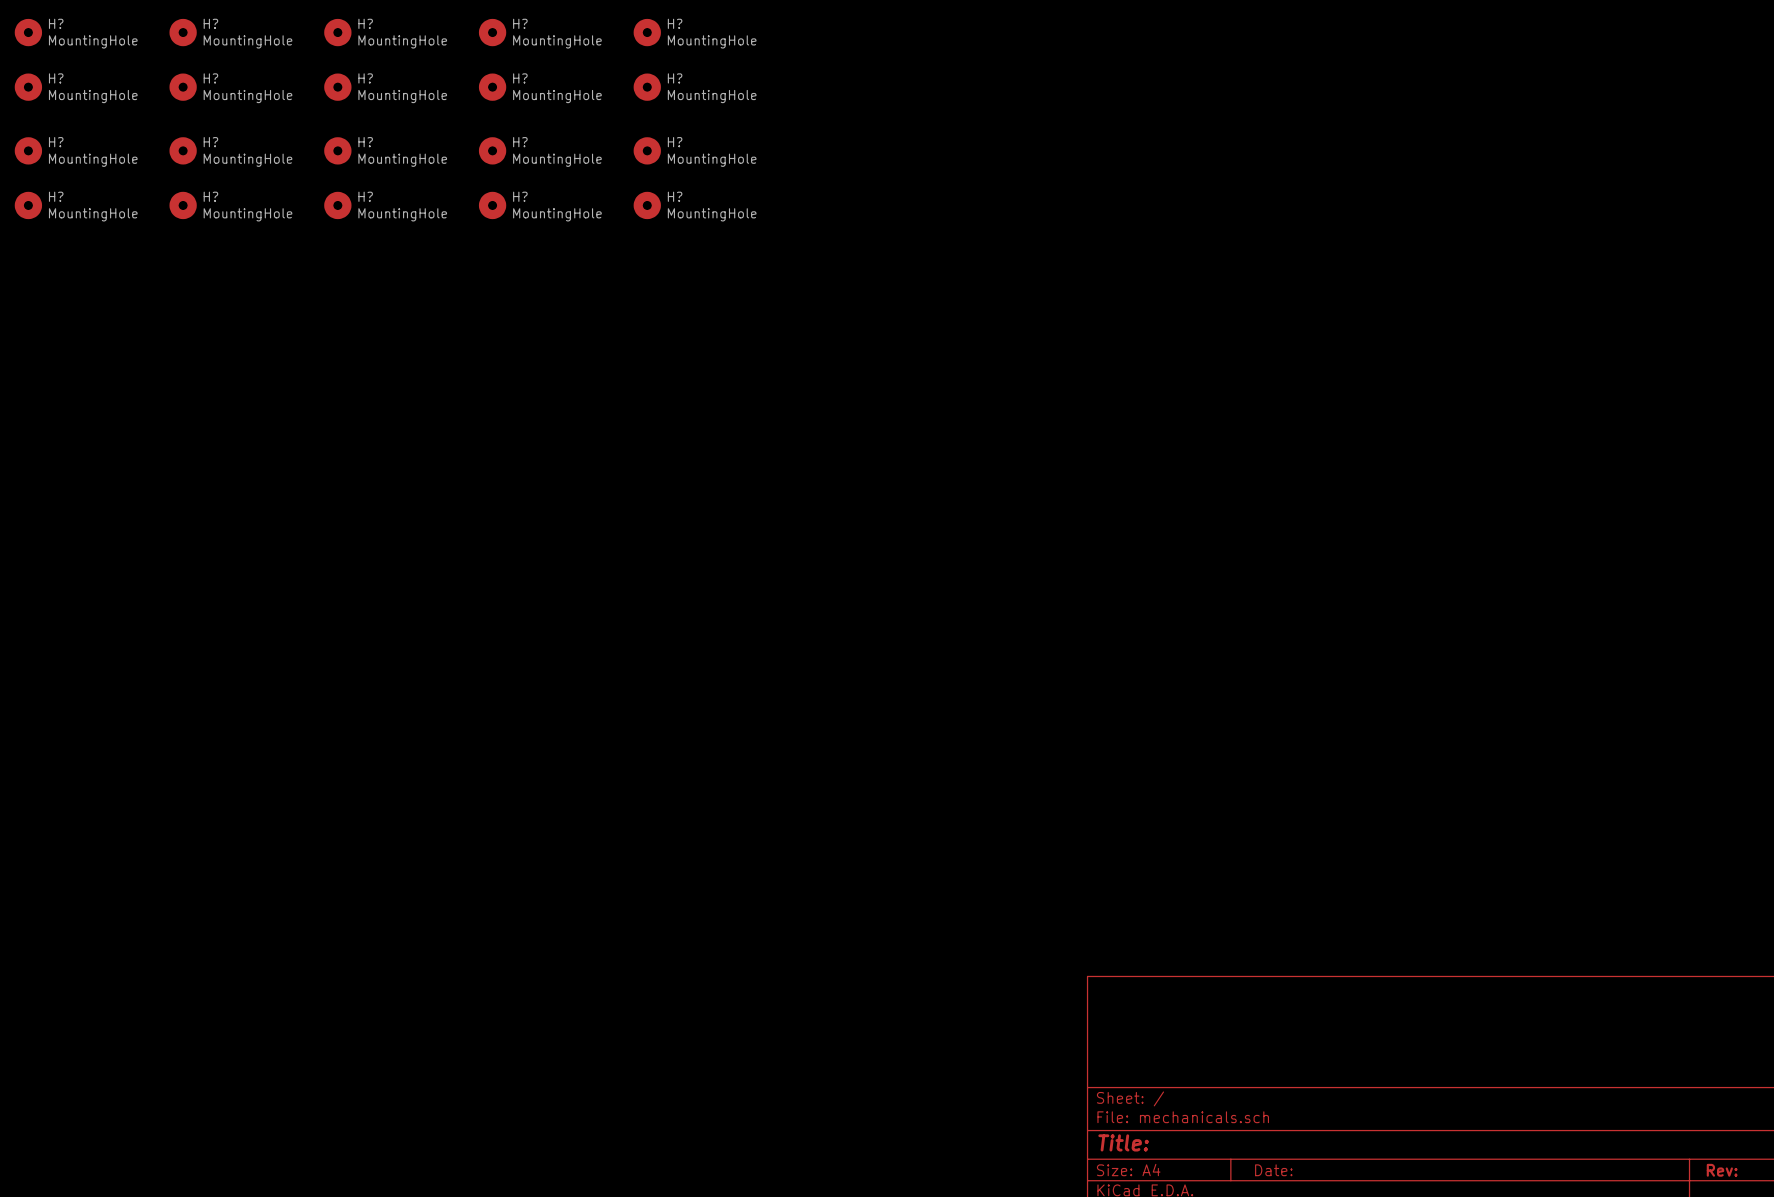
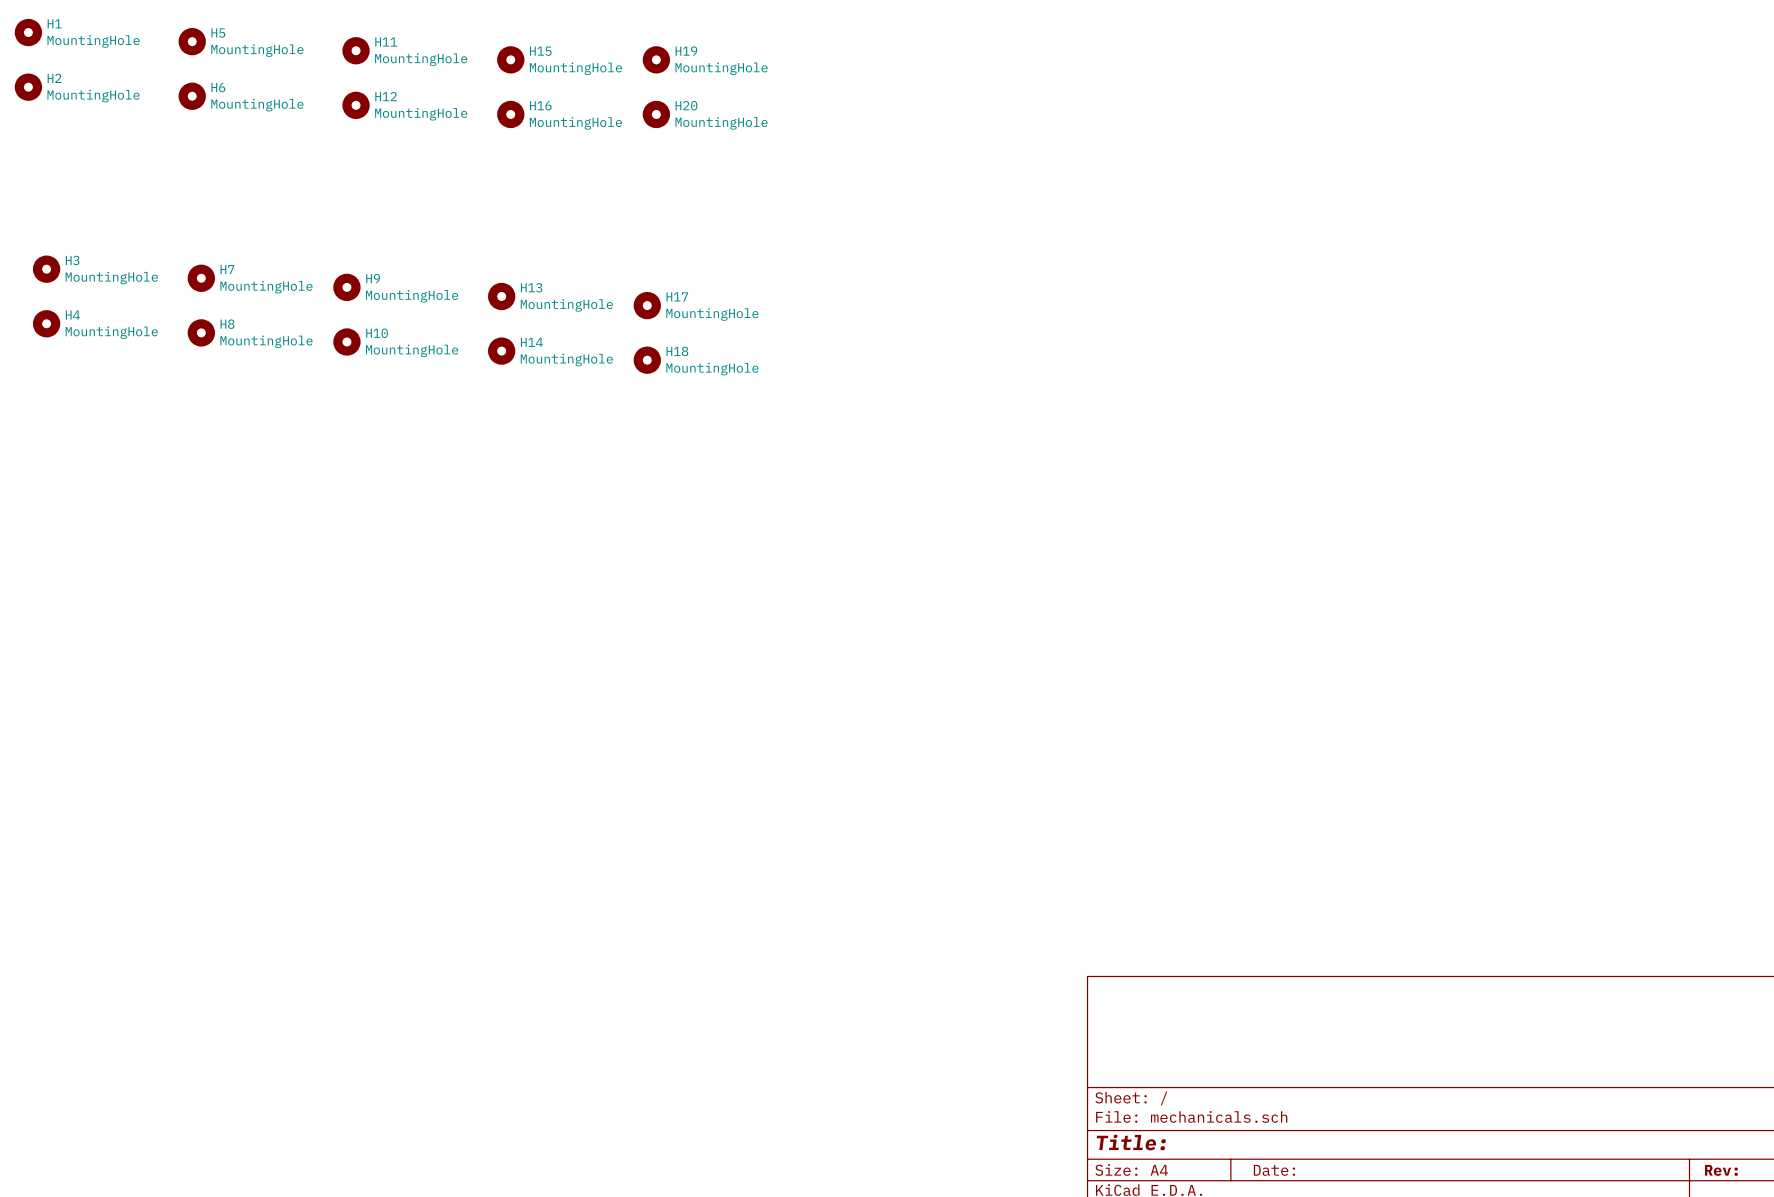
H? name: H? (56, 23) -> H1 (54, 23)
H?: MountingHole (183, 32) -> none
H?: MountingHole (337, 32) -> none
H?: MountingHole (492, 32) -> none
H?: MountingHole (647, 32) -> none
H5: none -> MountingHole (192, 41)
H11: none -> MountingHole (356, 50)
H15: none -> MountingHole (510, 59)
H19: none -> MountingHole (656, 59)
H? name: H? (56, 78) -> H2 (54, 78)
H?: MountingHole (183, 87) -> none
H?: MountingHole (337, 87) -> none
H?: MountingHole (492, 87) -> none
H?: MountingHole (647, 87) -> none
H6: none -> MountingHole (192, 96)
H12: none -> MountingHole (356, 105)
H16: none -> MountingHole (510, 114)
H20: none -> MountingHole (656, 114)
H?: MountingHole (28, 150) -> none
H?: MountingHole (183, 150) -> none
H?: MountingHole (337, 150) -> none
H?: MountingHole (492, 150) -> none
H?: MountingHole (647, 150) -> none
H?: MountingHole (28, 205) -> none
H?: MountingHole (183, 205) -> none
H?: MountingHole (337, 205) -> none
H?: MountingHole (492, 205) -> none
H?: MountingHole (647, 205) -> none
H3: none -> MountingHole (46, 269)
H7: none -> MountingHole (201, 278)
H9: none -> MountingHole (346, 287)
H13: none -> MountingHole (501, 296)
H17: none -> MountingHole (647, 305)
H4: none -> MountingHole (46, 323)
H8: none -> MountingHole (201, 332)
H10: none -> MountingHole (346, 341)
H14: none -> MountingHole (501, 351)
H18: none -> MountingHole (647, 360)

